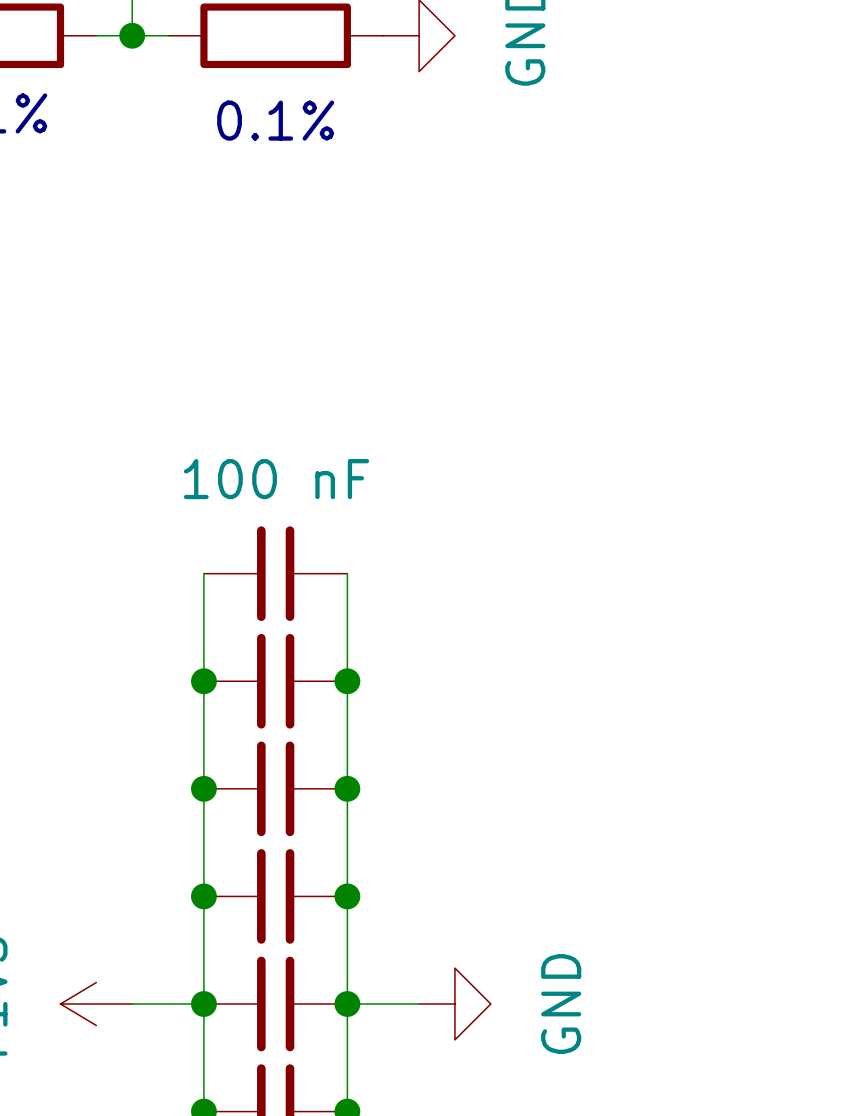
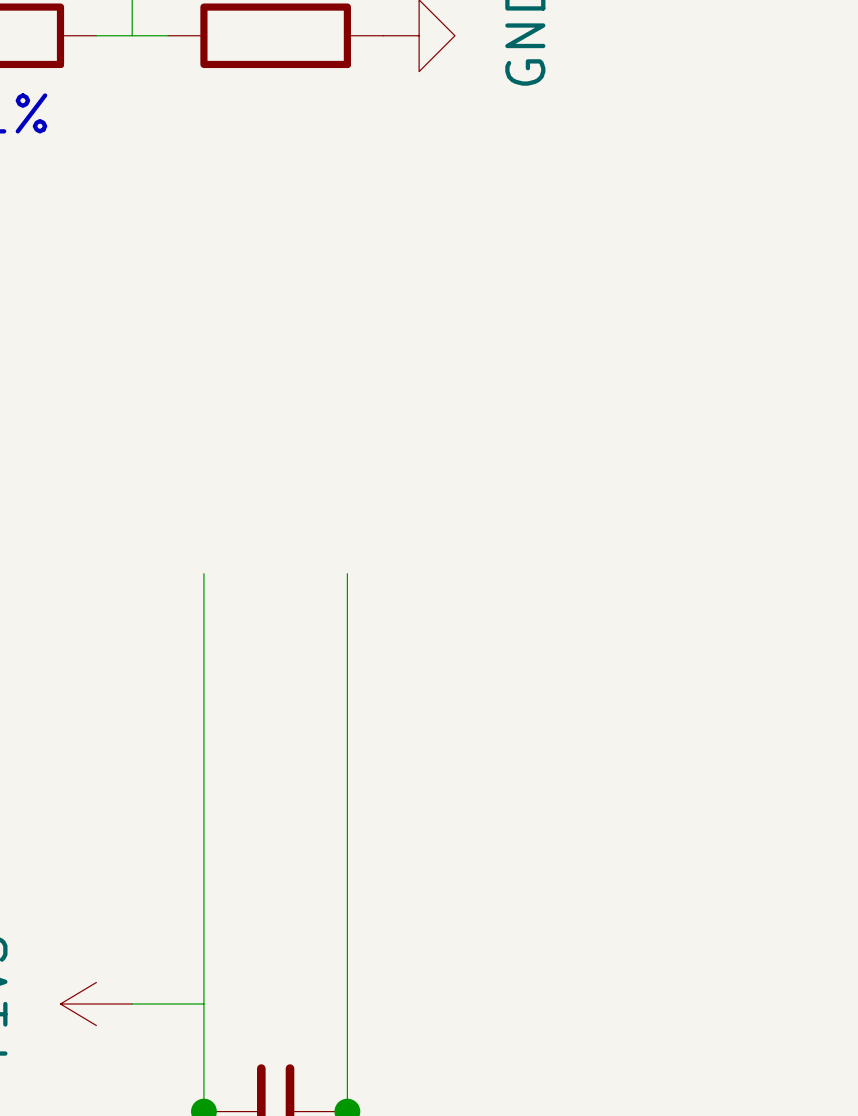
junction: (132, 35) -> none
text: 0.1% (275, 120) -> none
part: 100 nF (275, 573) -> none
junction: (203, 681) -> none
part: (275, 681) -> none
junction: (347, 681) -> none
junction: (203, 788) -> none
part: (275, 788) -> none
junction: (347, 788) -> none
junction: (203, 896) -> none
part: (275, 896) -> none
junction: (347, 896) -> none
junction: (203, 1004) -> none
part: (275, 1004) -> none
wire: (347, 1004) (419, 1004) -> none
junction: (347, 1004) -> none
power symbol: GND (454, 1004) -> none

